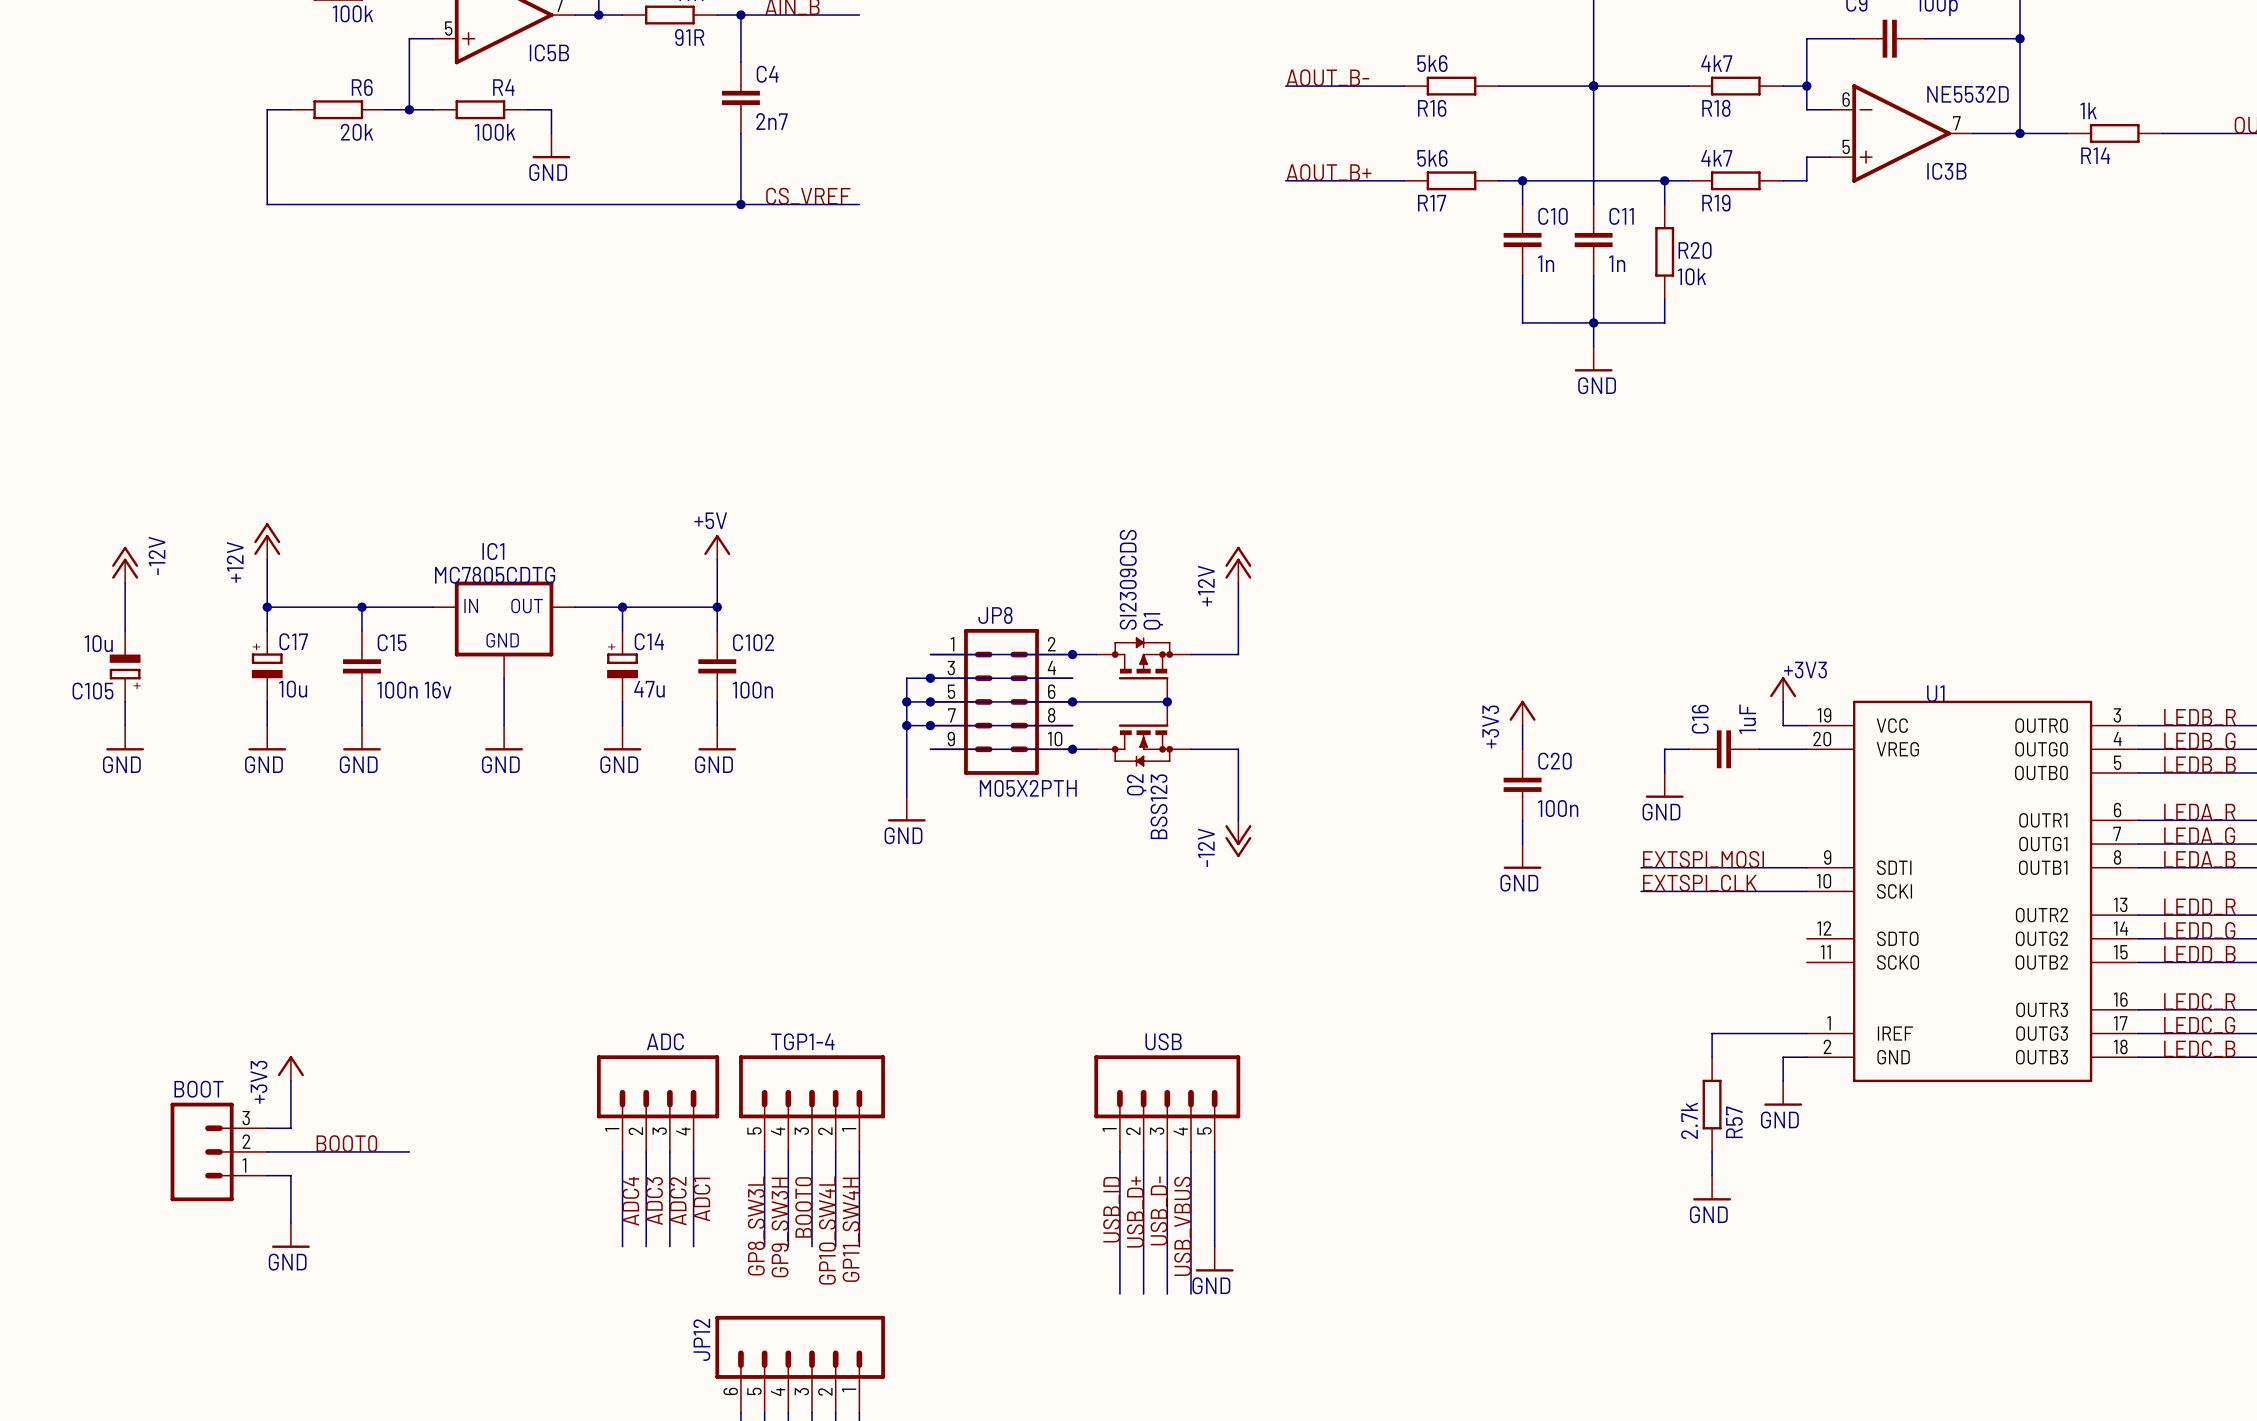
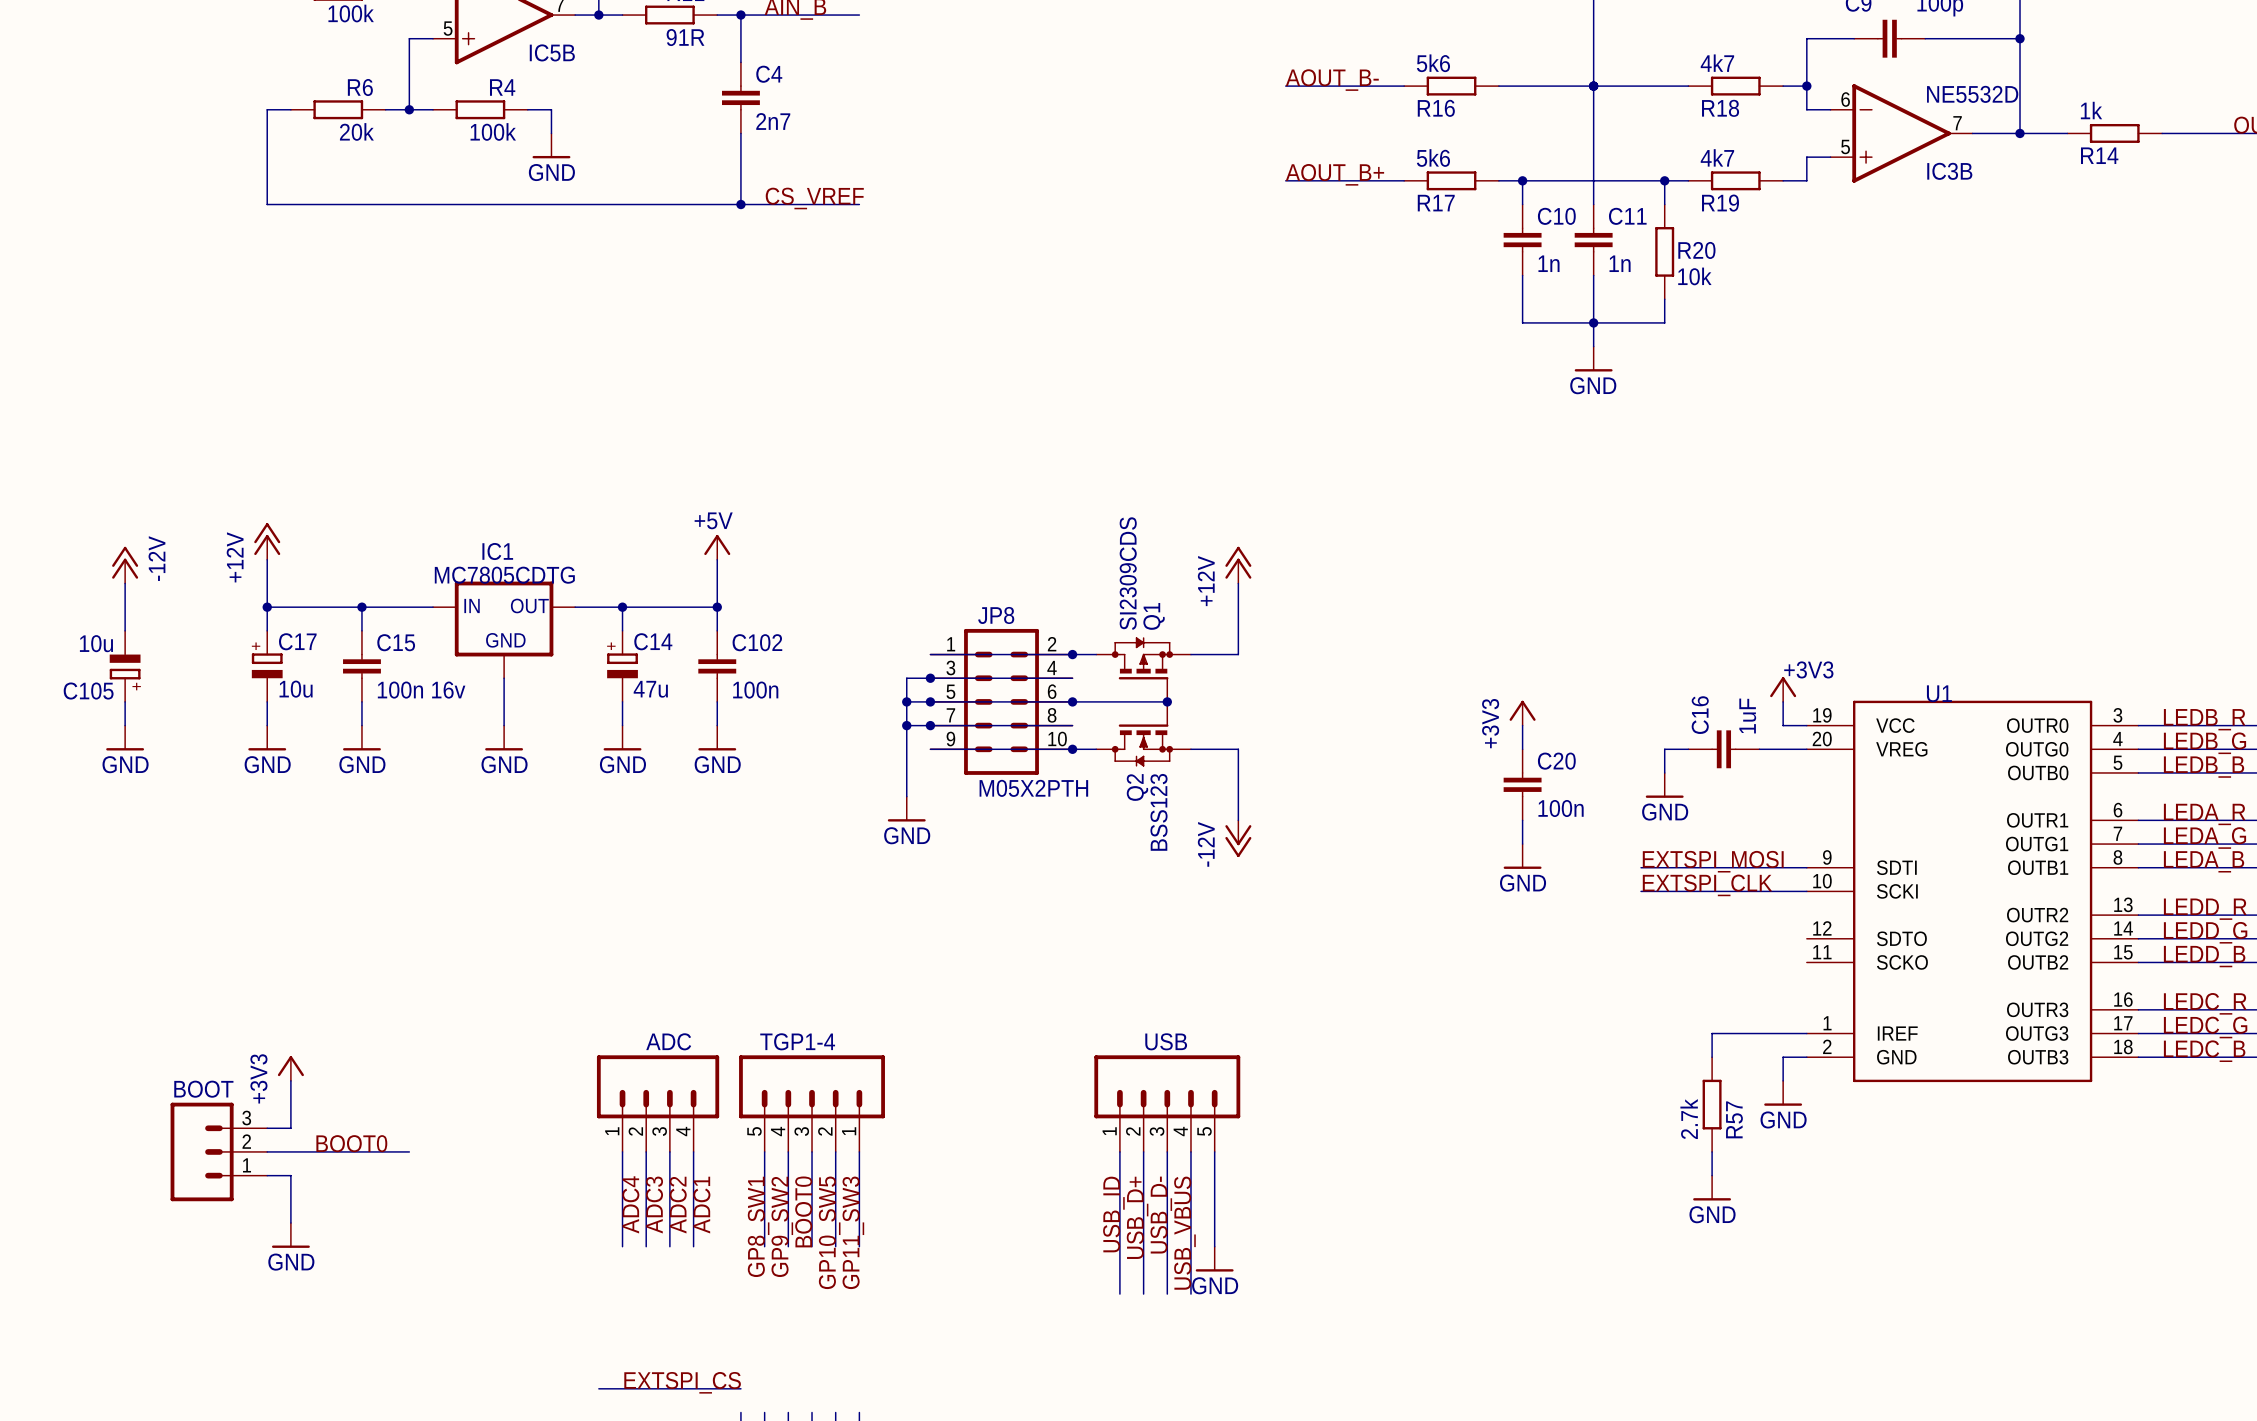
label: GP8_SW3L (756, 1225) -> GP8_SW1 (758, 1226)
label: GP9_SW3H (780, 1227) -> GP9_SW2 (782, 1226)
label: GP11_SW4H (851, 1229) -> GP11_SW3 (853, 1232)
label: GP10_SW4L (827, 1230) -> GP10_SW5 (829, 1232)
JP12: (800, 1364) -> none
label: none -> EXTSPI_CS (682, 1382)
wire: none -> (598, 1388) (740, 1388)

